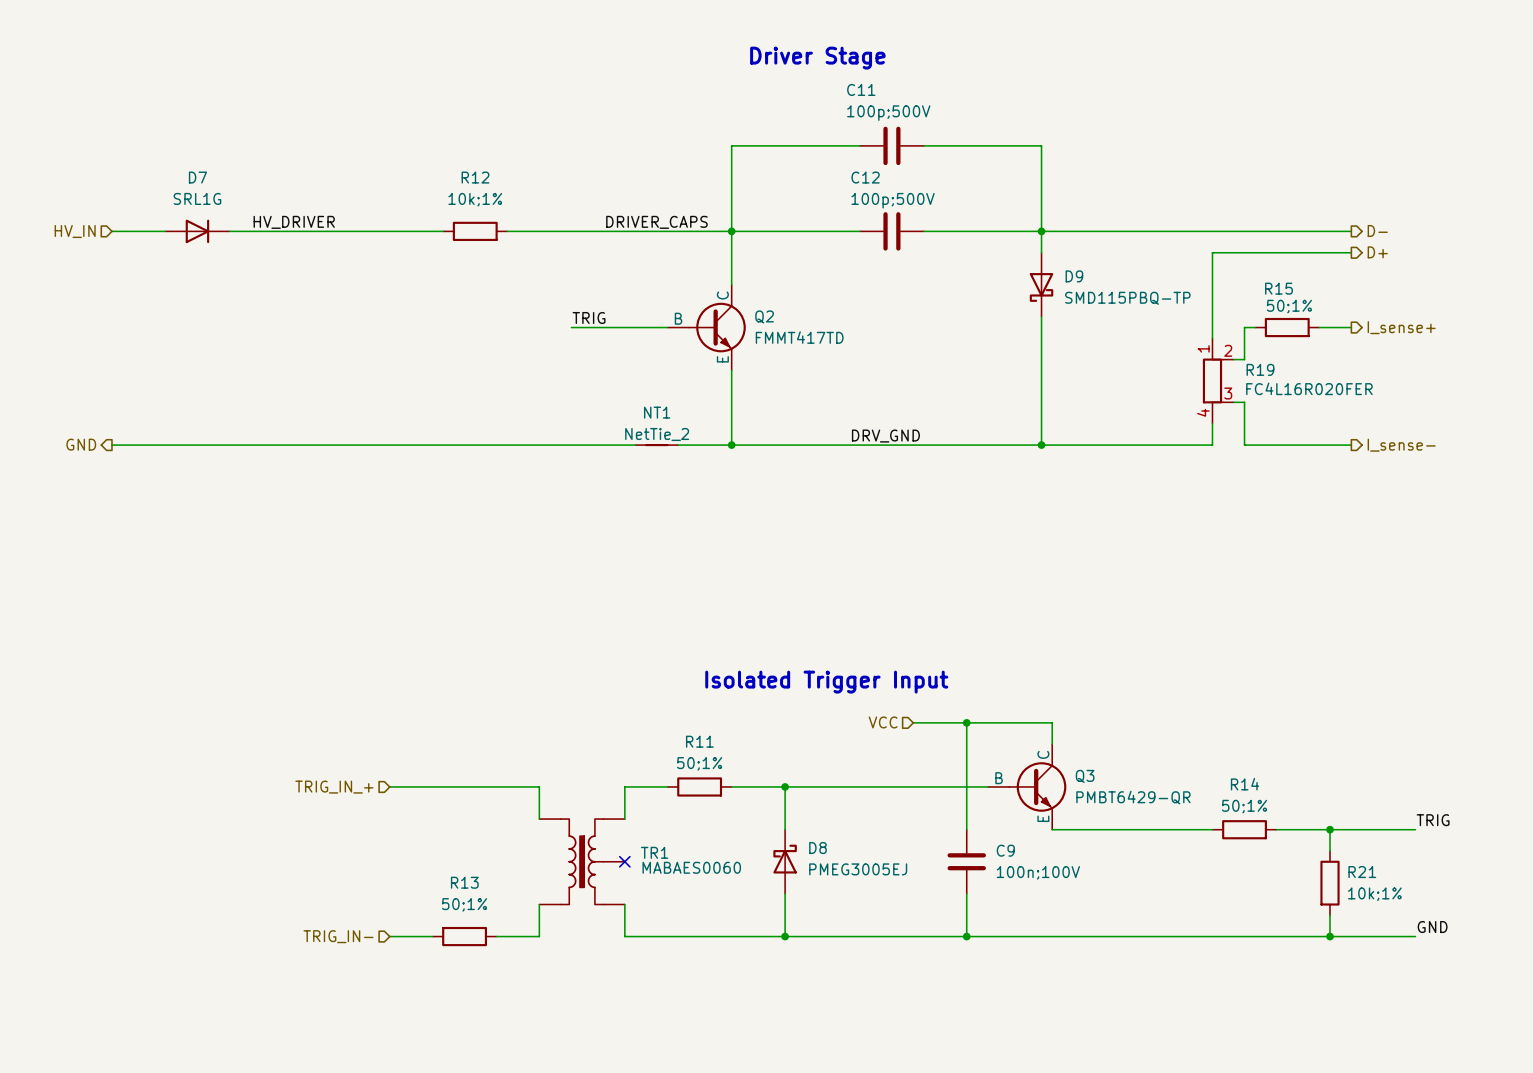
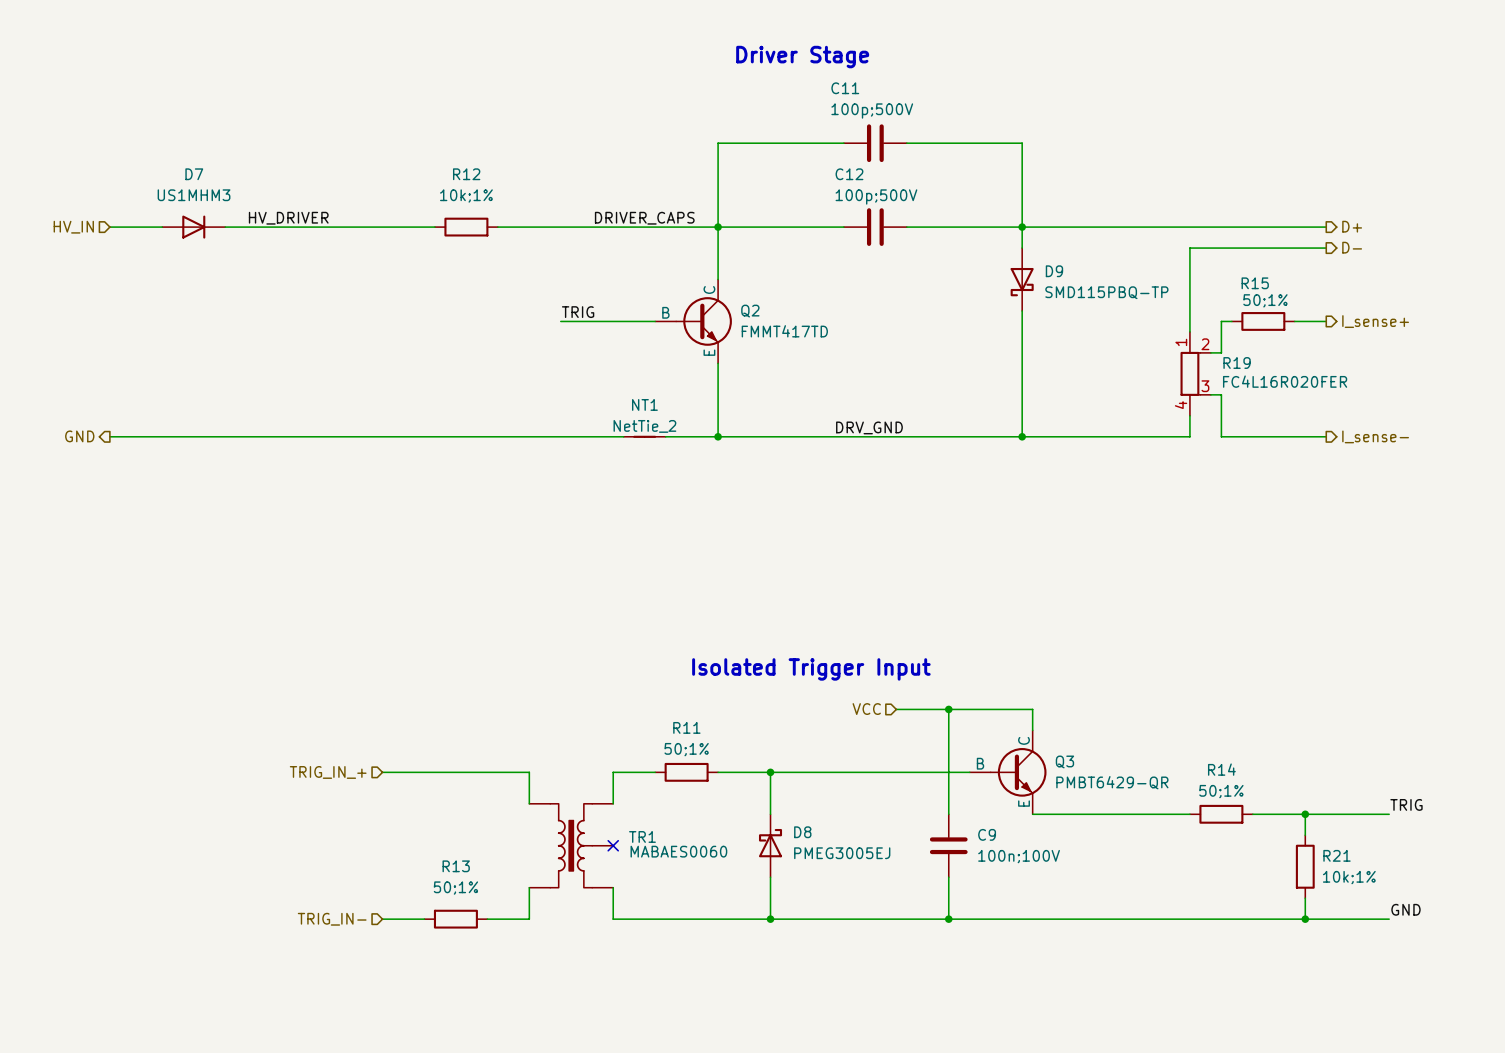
D7 value: SRL1G (197, 198) -> US1MHM3 (194, 195)
hierarchical label: D- (1377, 230) -> D+ (1352, 226)
hierarchical label: D+ (1377, 252) -> D- (1352, 247)

